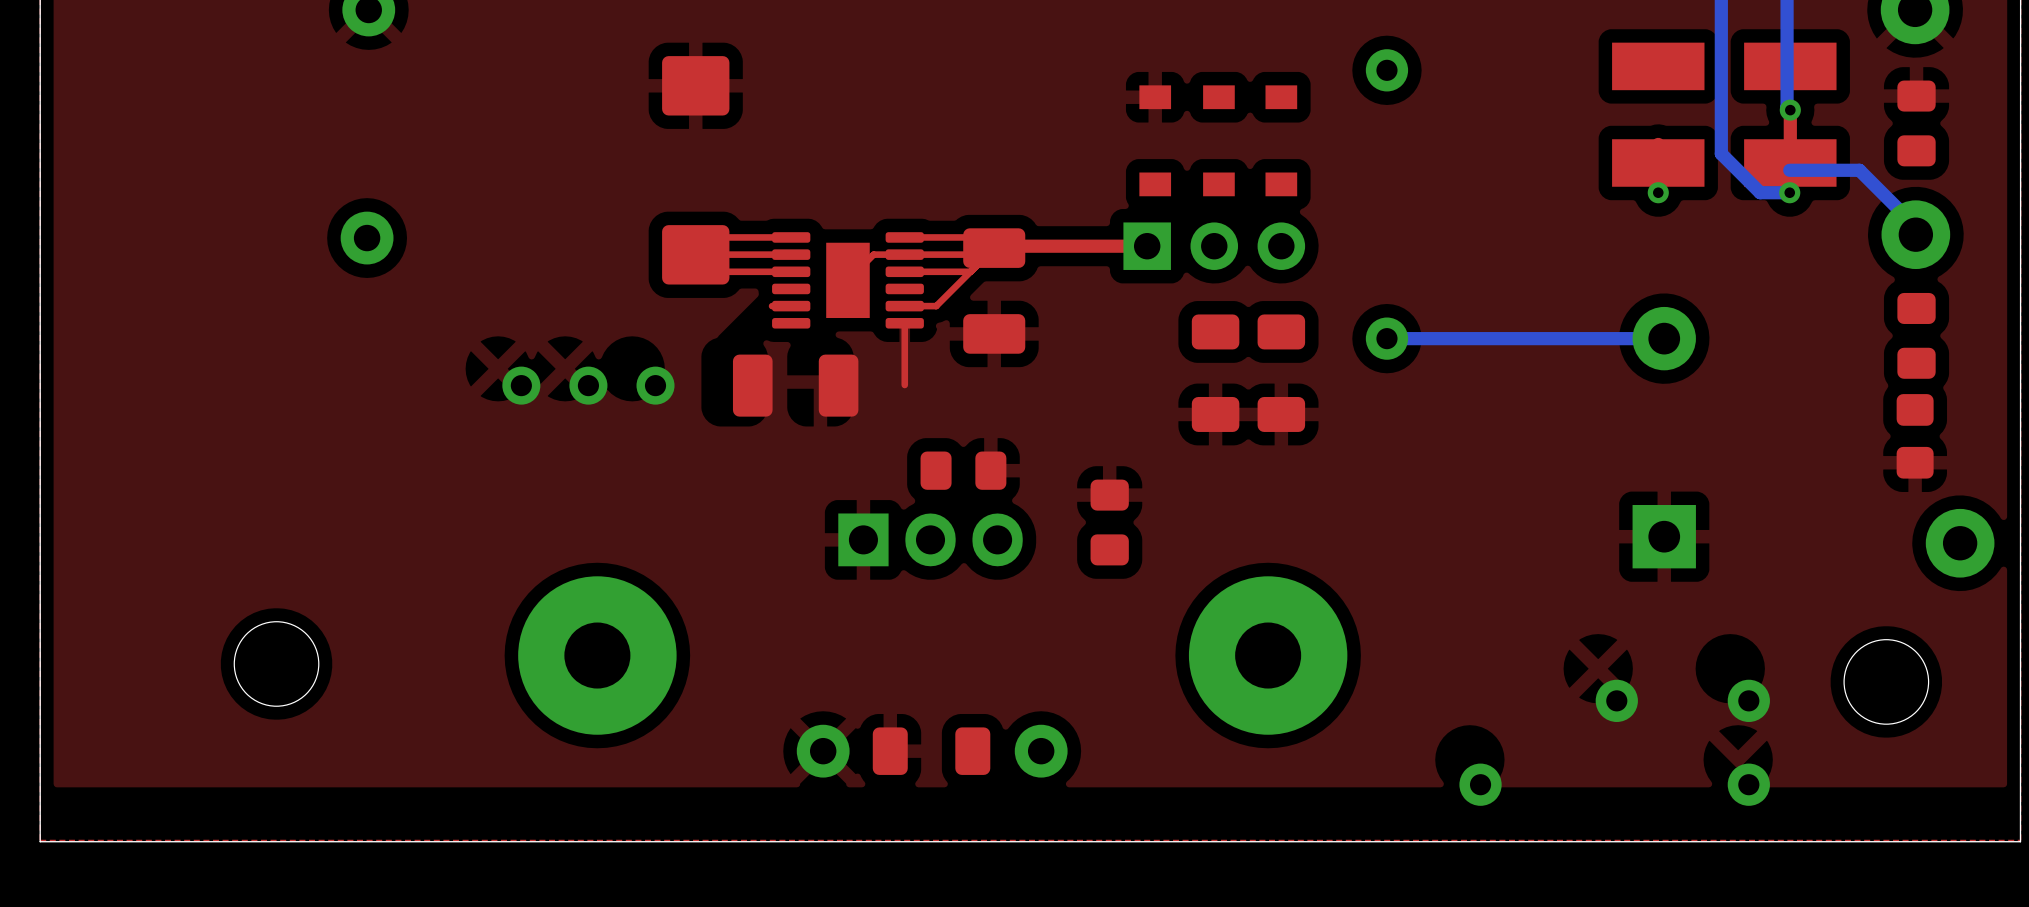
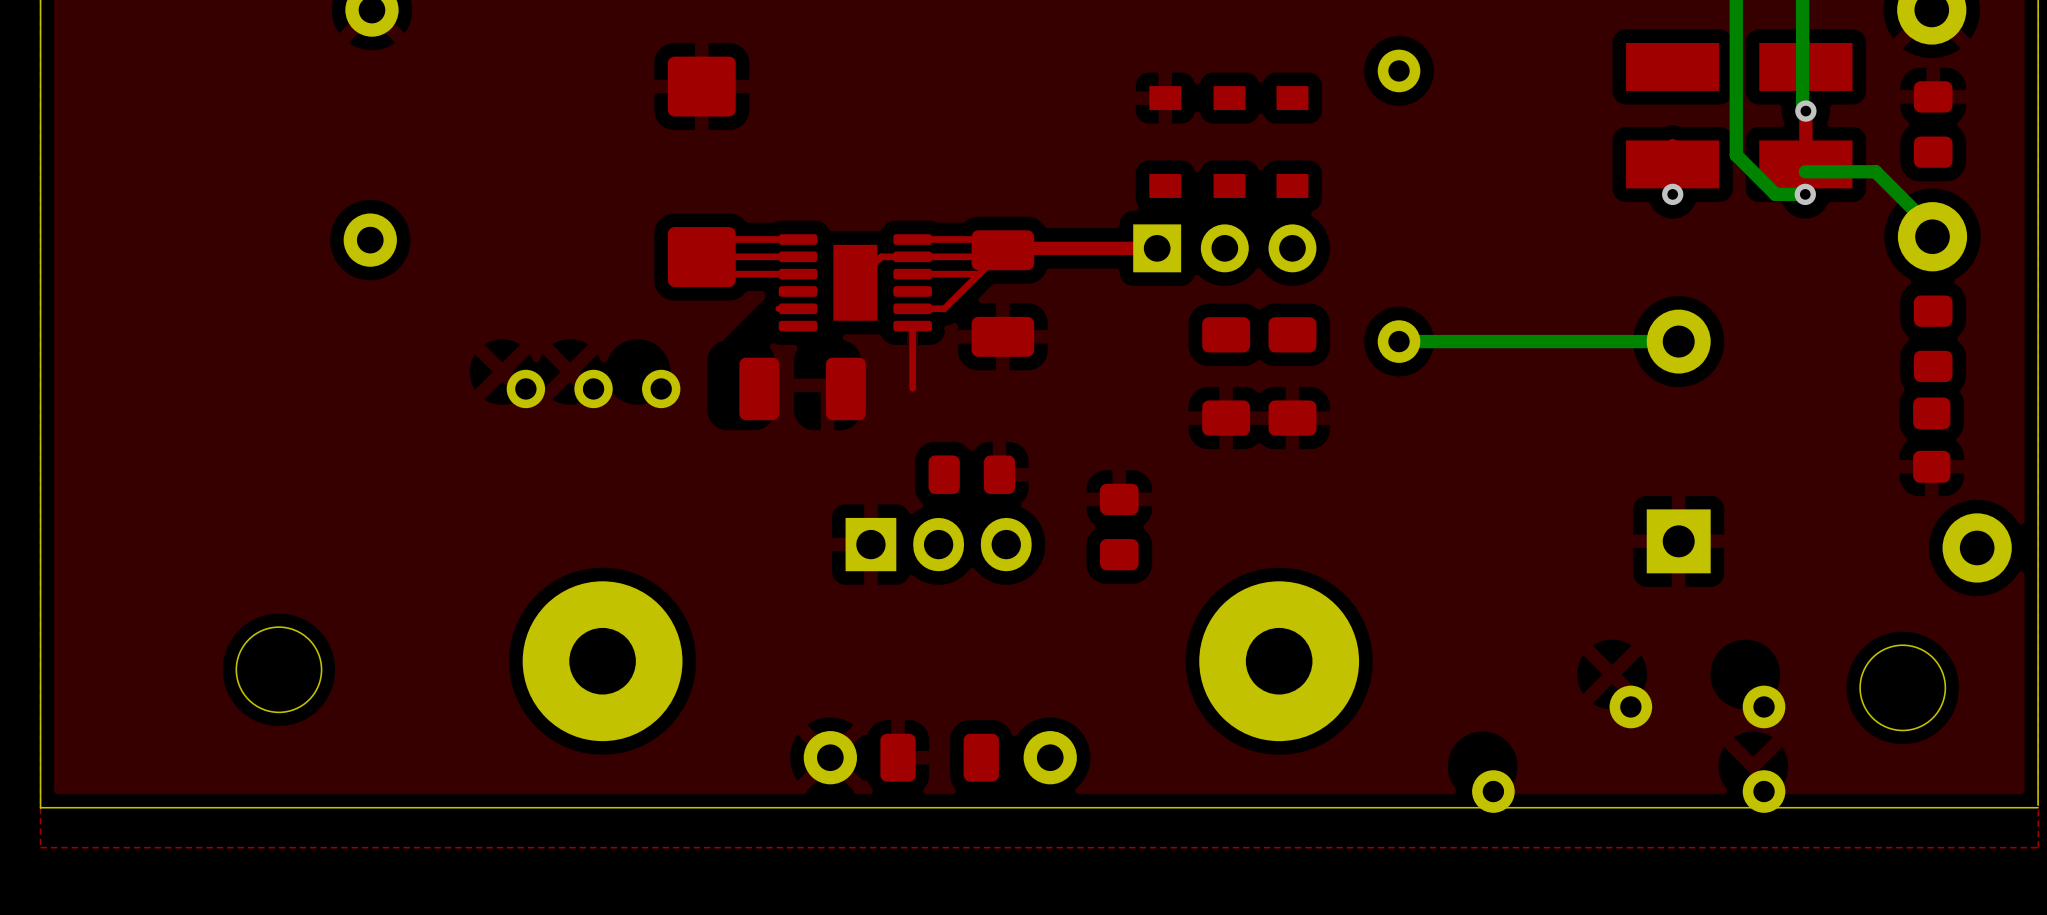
board edge: (2020, 798) (2020, 841) (40, 841) (40, 800) -> (2038, 807) (40, 807)

